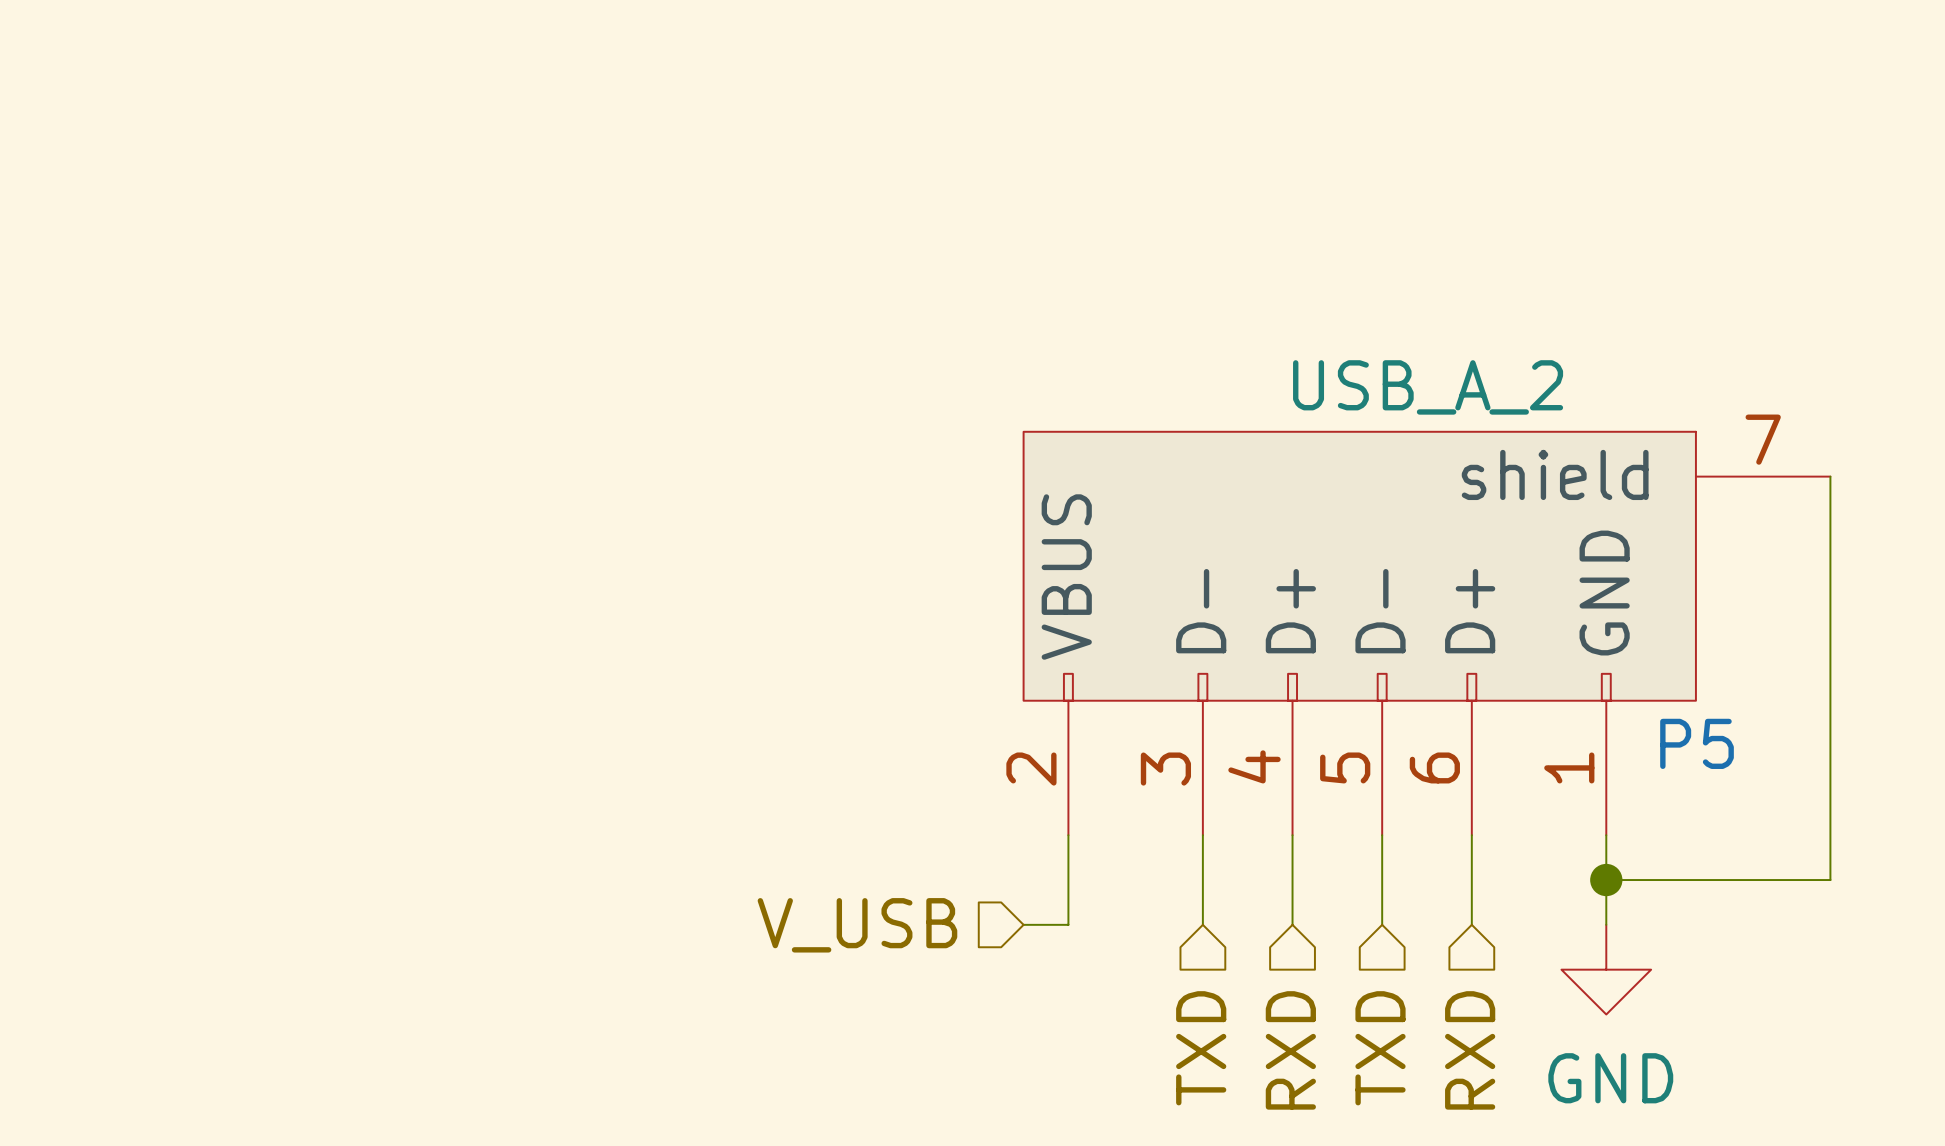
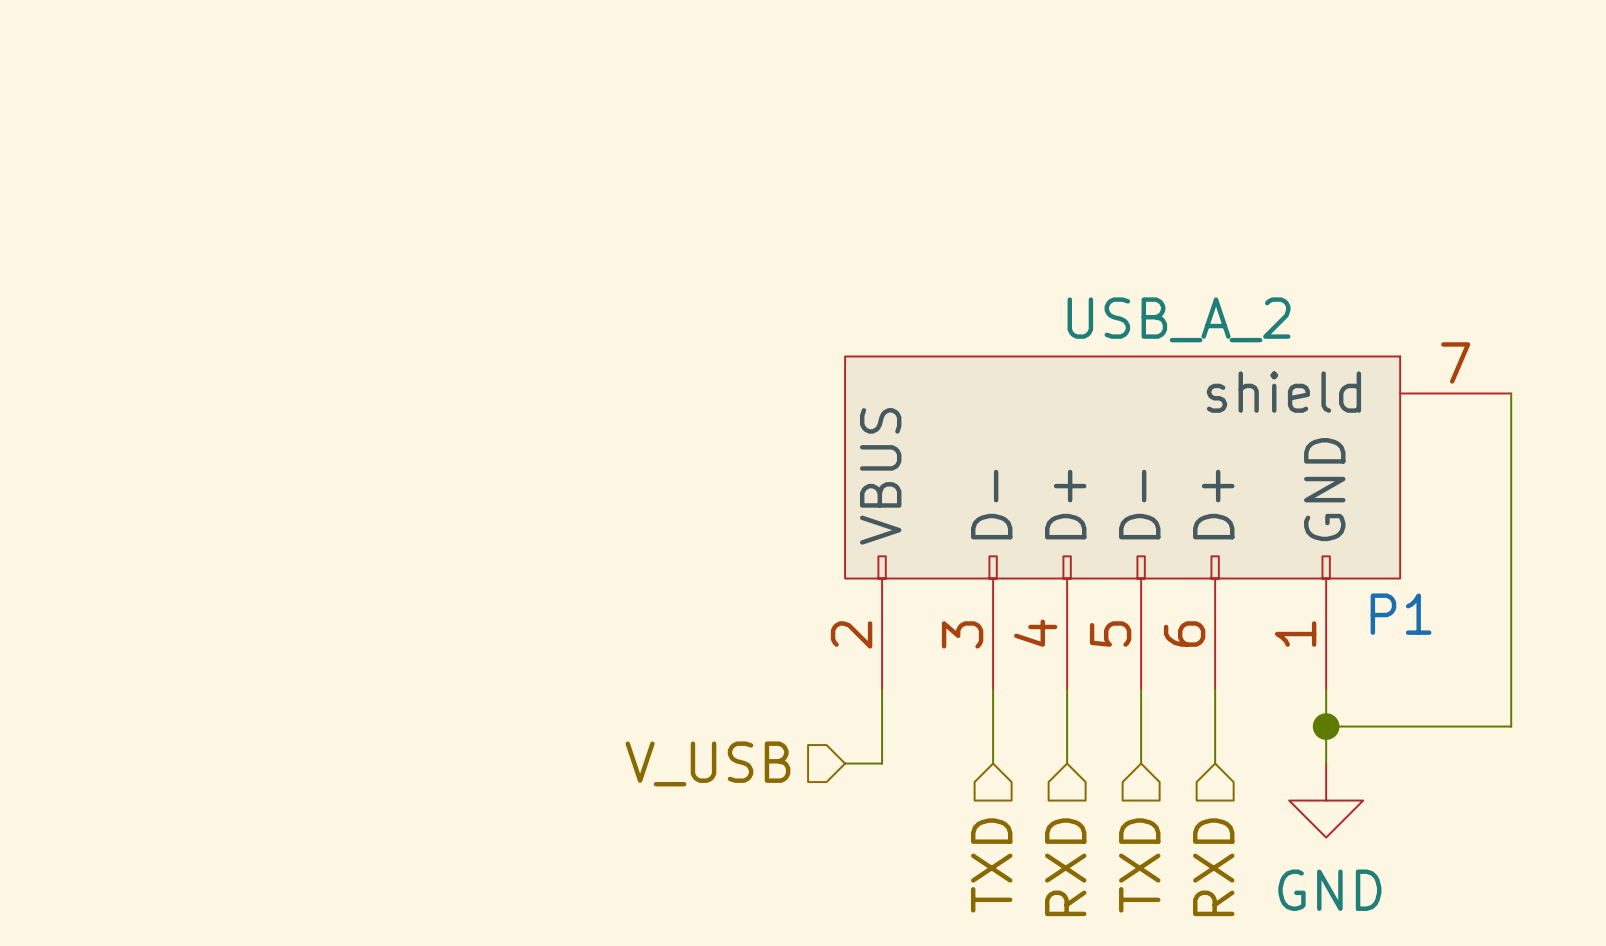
P5 name: P5 (1697, 743) -> P1 (1401, 614)

